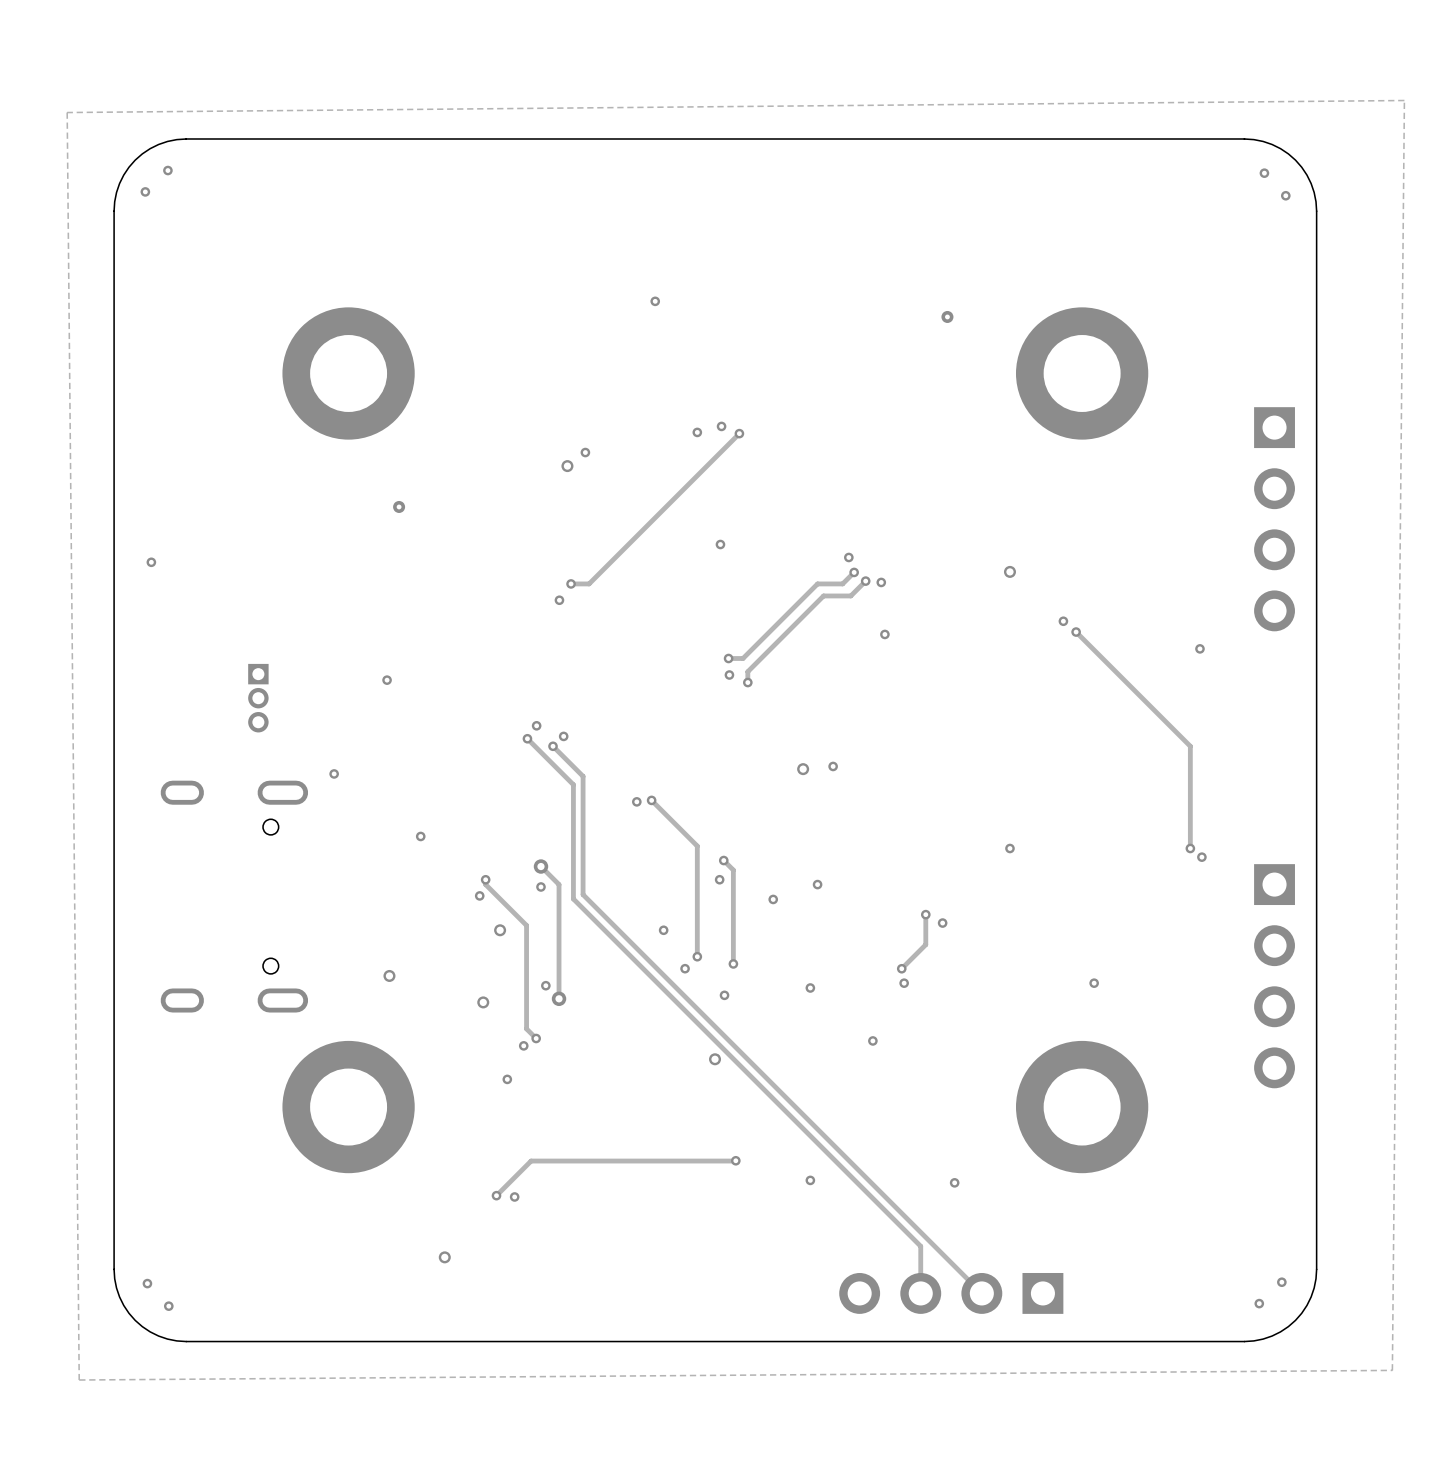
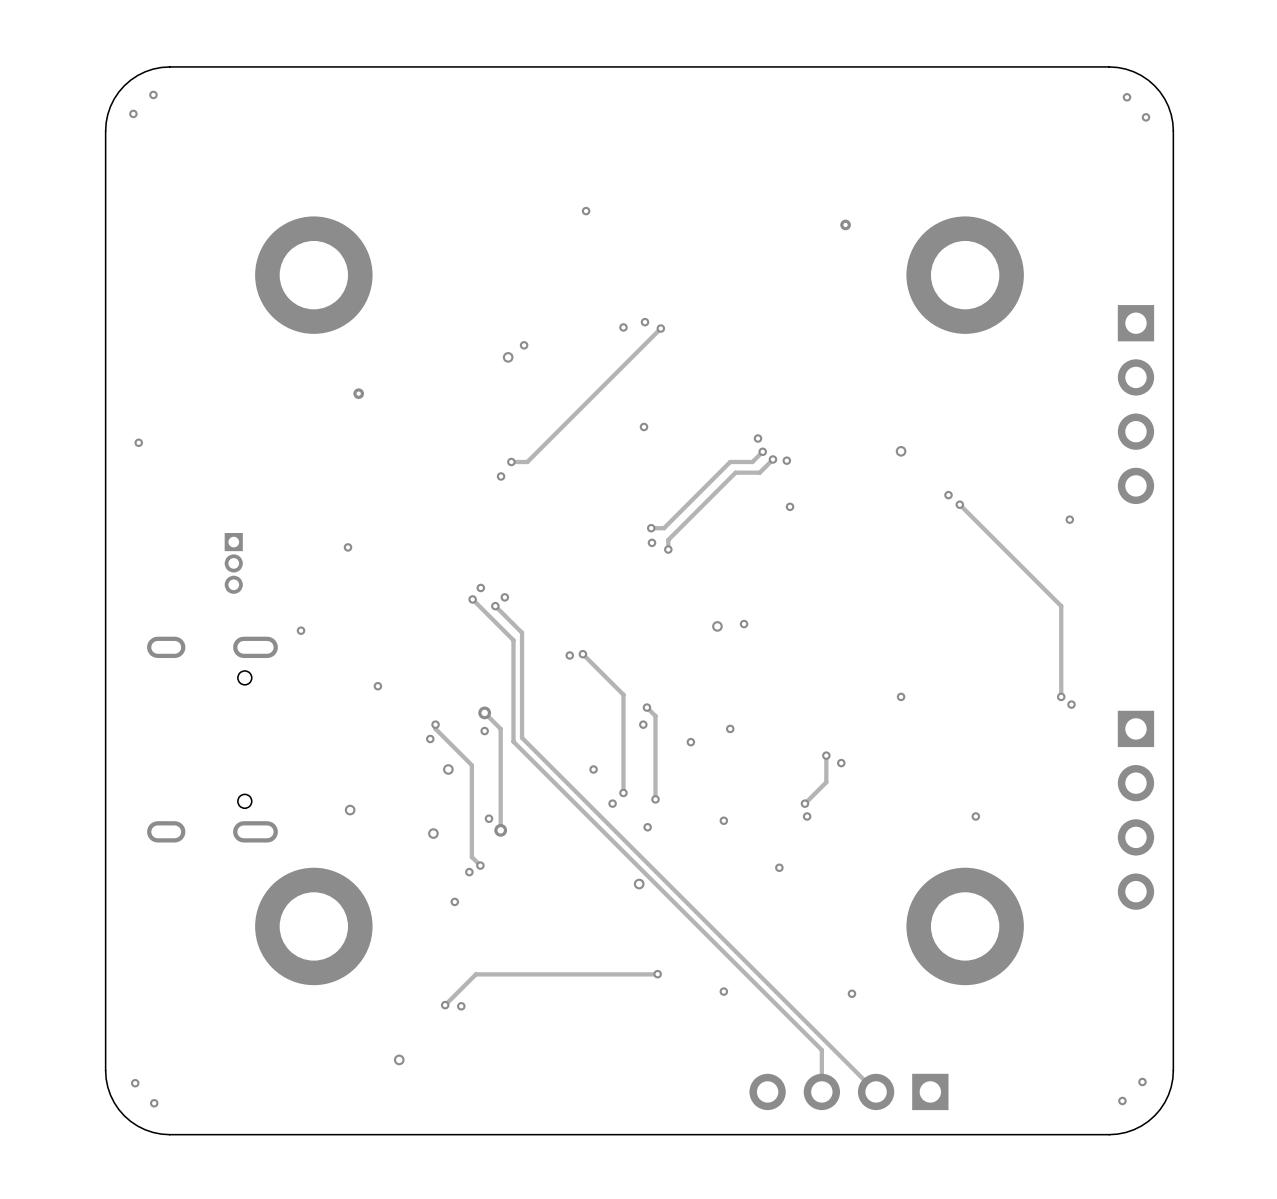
zone outline: (1404, 100) (67, 112) (79, 1380) (1392, 1370) (1404, 100) -> none

